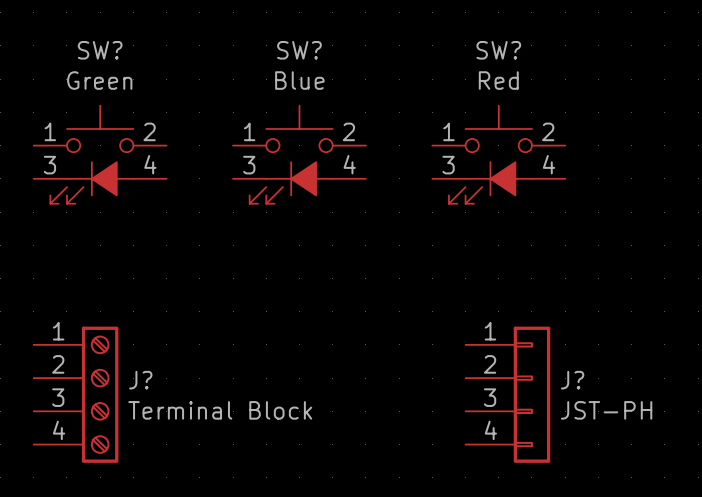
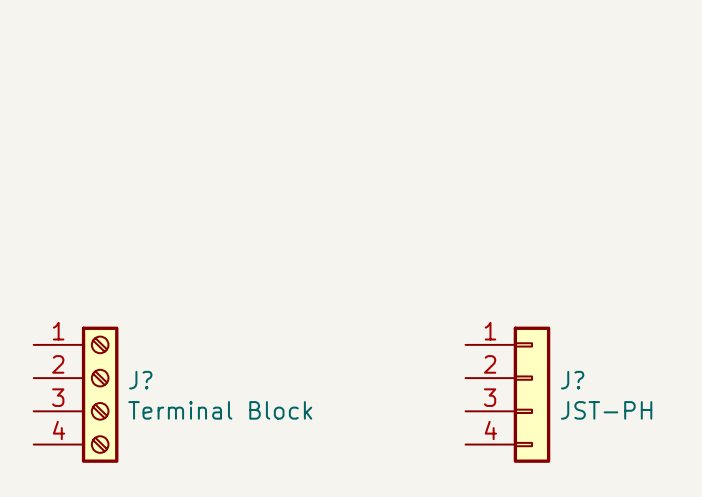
SW?: Green (100, 154) -> none
SW?: Blue (299, 154) -> none
SW?: Red (498, 154) -> none

